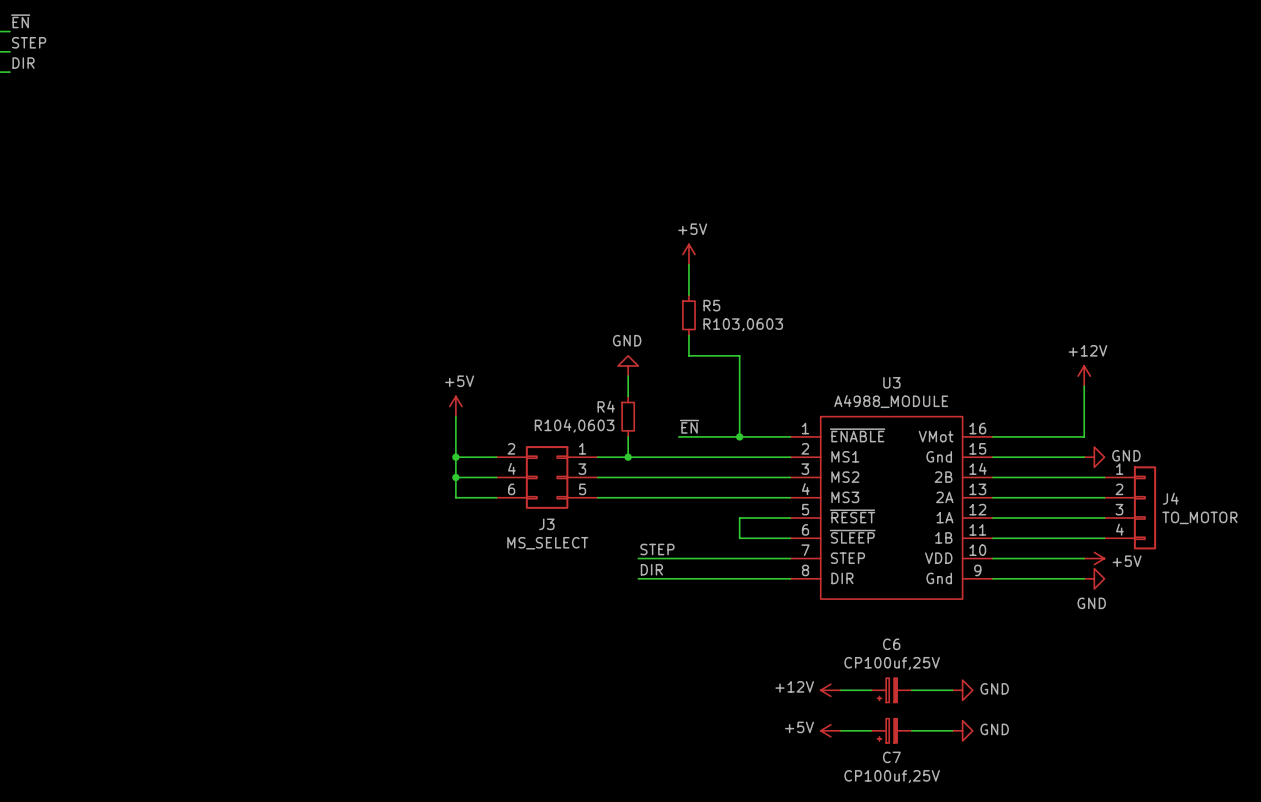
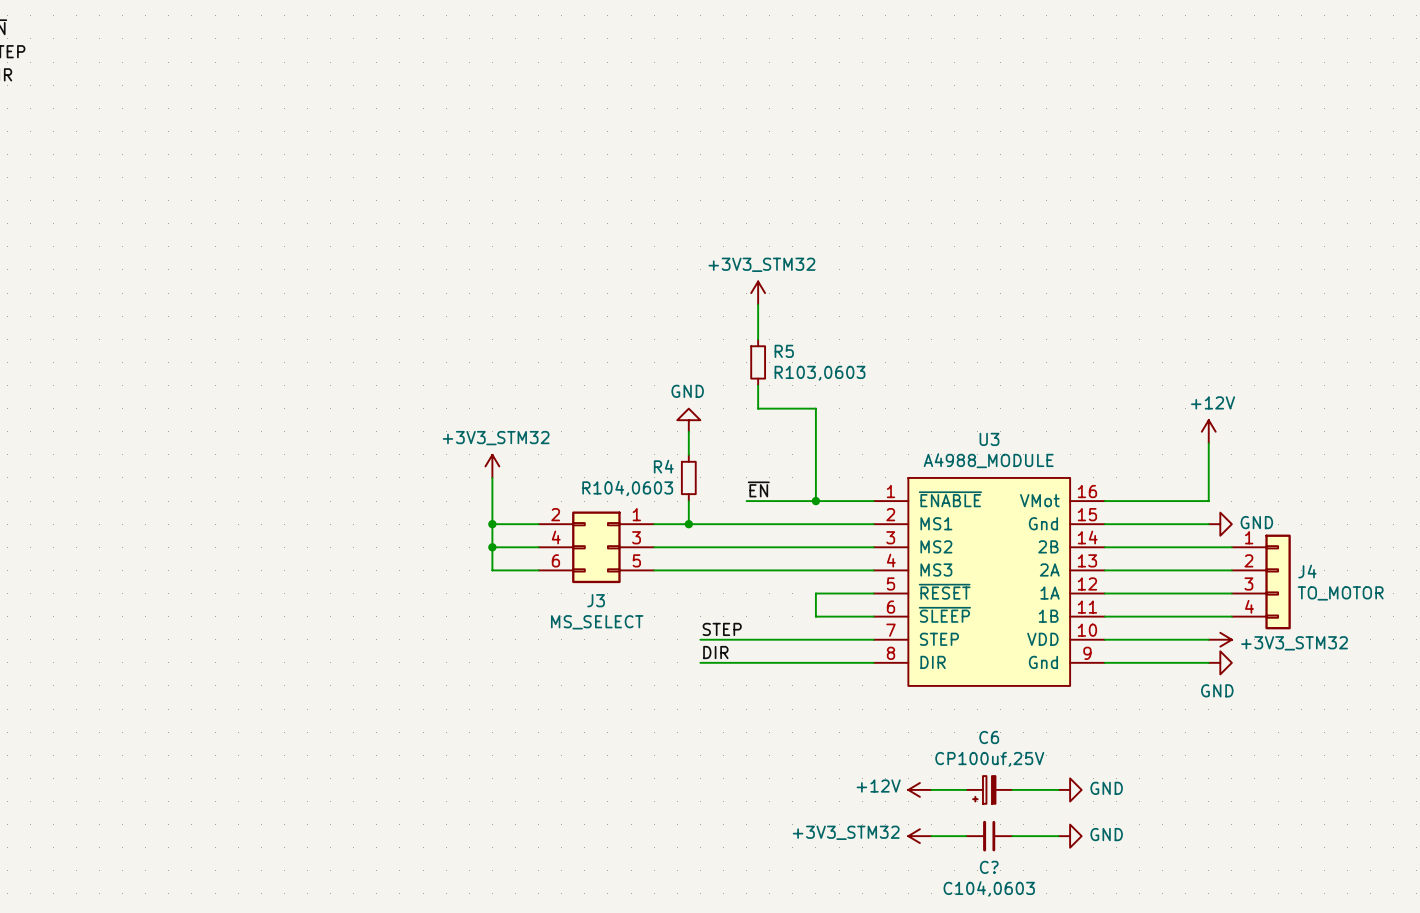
power symbol: +5V (688, 254) -> +3V3_STM32 (758, 293)
power symbol: +5V (455, 406) -> +3V3_STM32 (492, 466)
power symbol: +5V (1094, 558) -> +3V3_STM32 (1220, 639)
power symbol: +5V (830, 730) -> +3V3_STM32 (919, 836)
C7: CP100uf,25V (891, 730) -> none
C?: none -> C104,0603 (989, 836)

